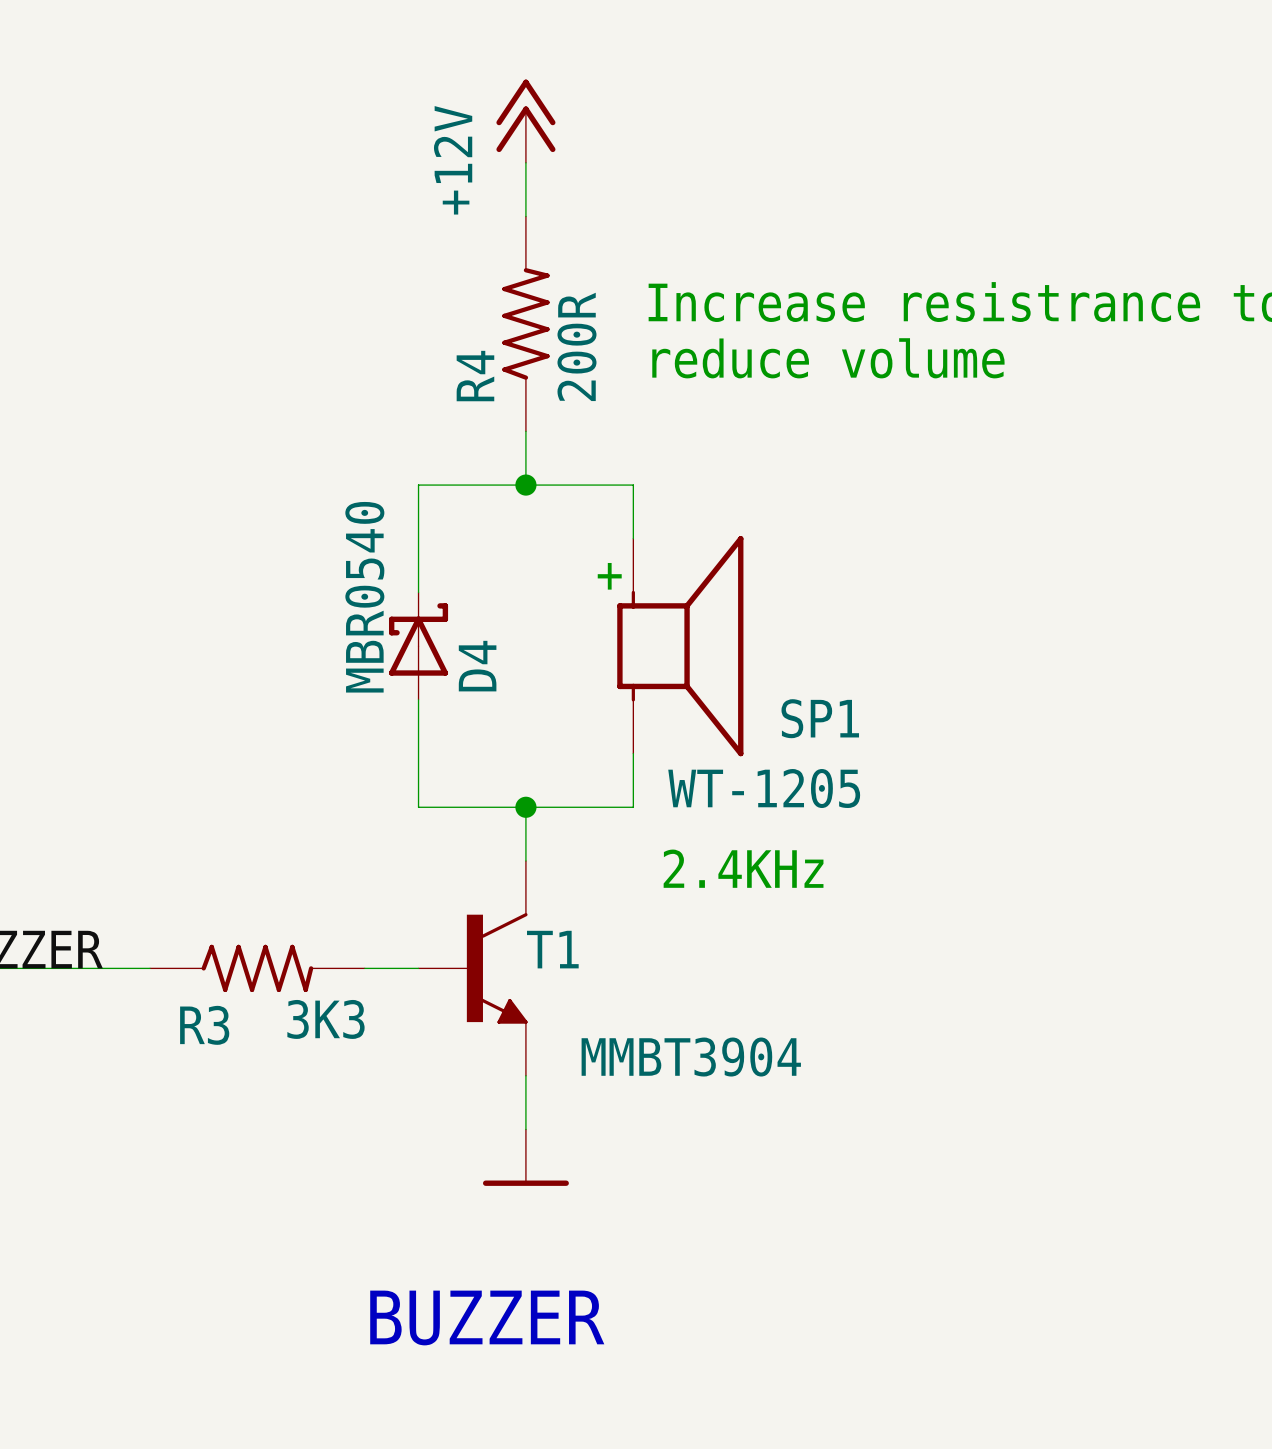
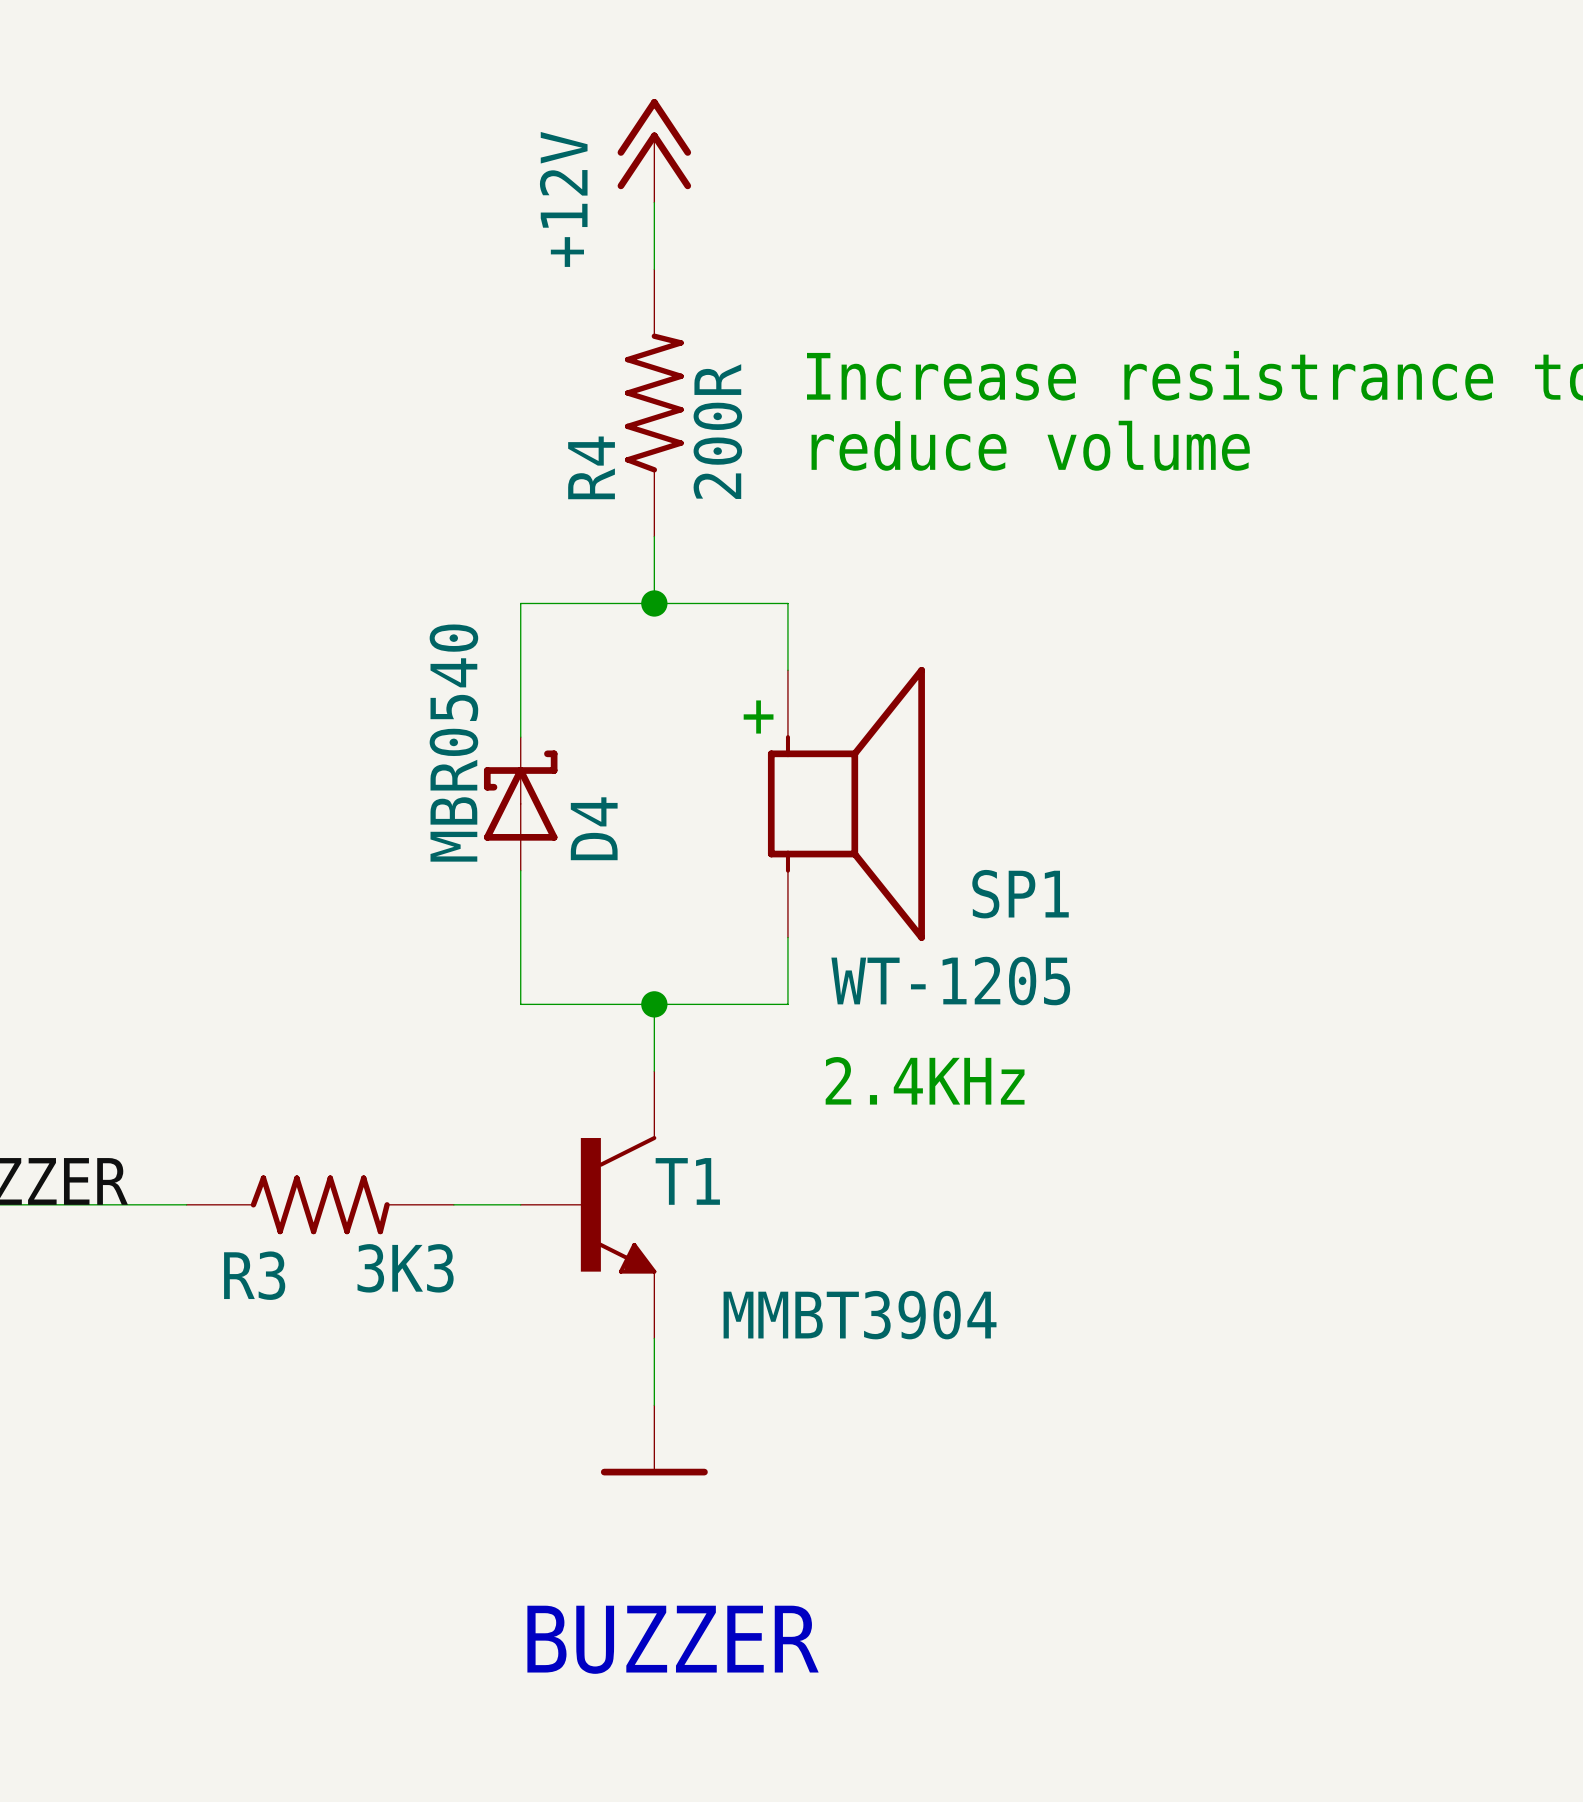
text position: BUZZER (487, 1317) -> BUZZER (673, 1639)

